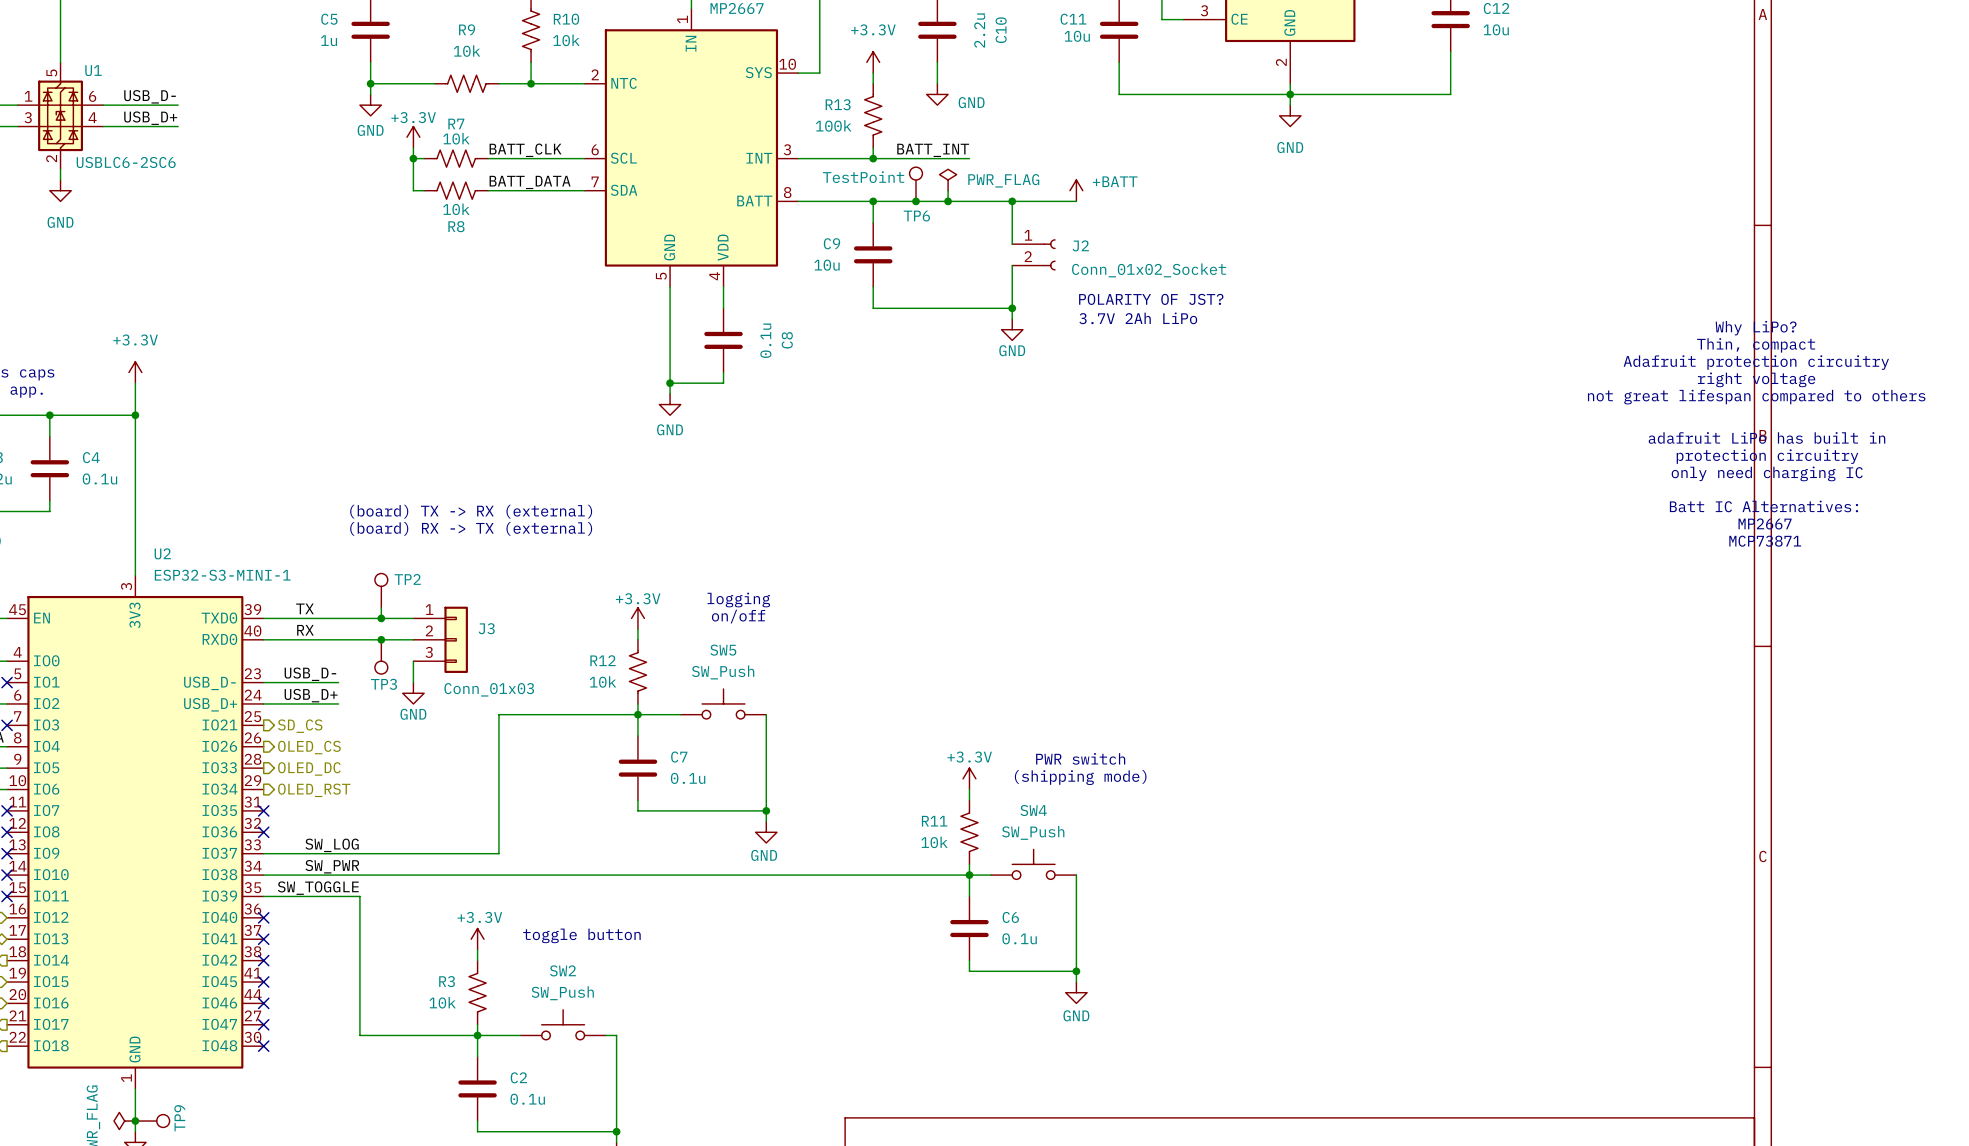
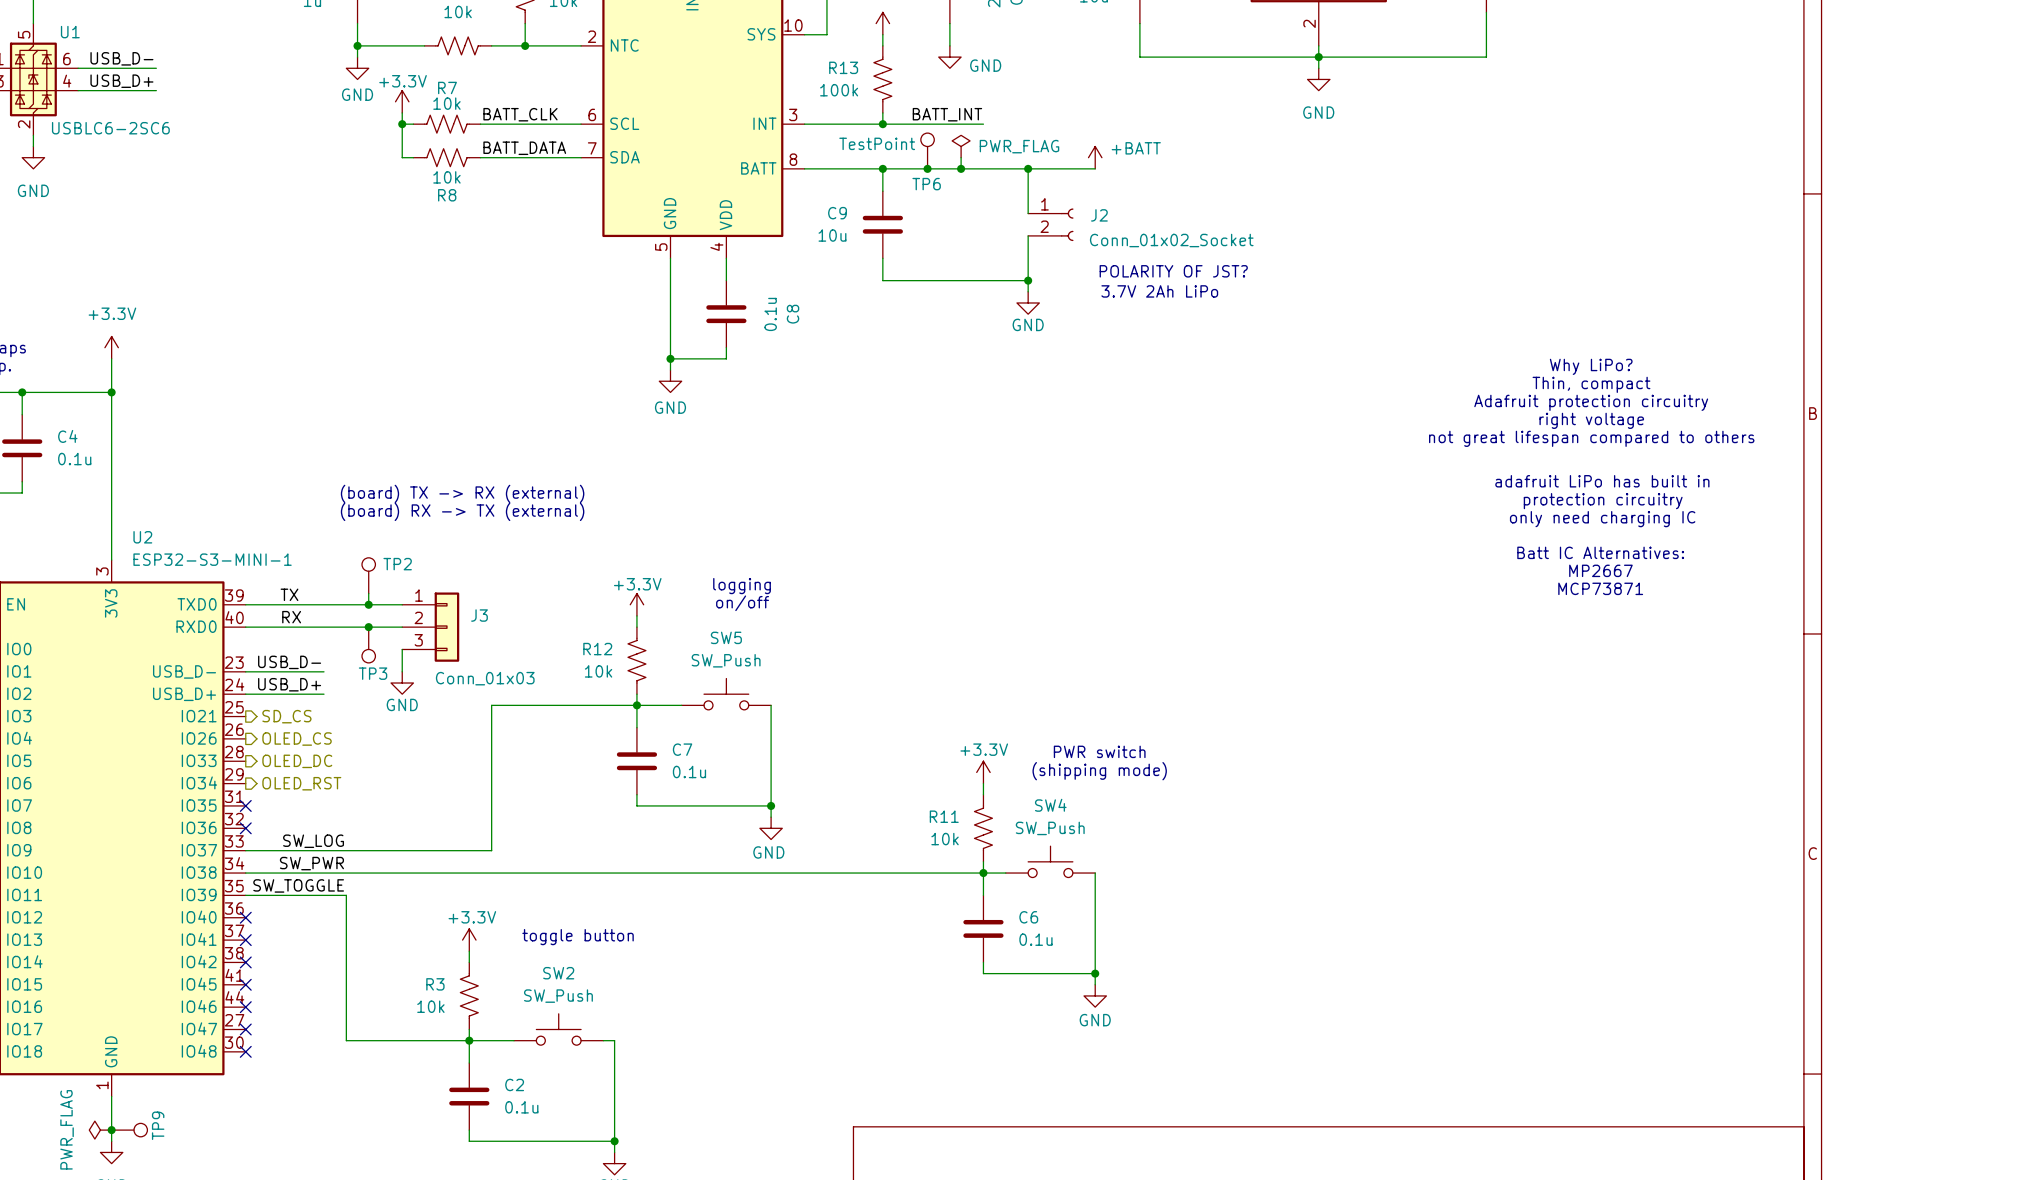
text: Why LiPo? (1756, 328) -> none
text: Thin, compact (1756, 345) -> none
text: Adafruit protection circuitry (1756, 362) -> none
text: right voltage (1756, 379) -> none
text: none -> Why LiPo? (1591, 366)
text: not great lifespan compared to others (1756, 397) -> none
text: none -> Thin, compact (1591, 384)
text: none -> Adafruit protection circuitry (1591, 402)
text: adafruit LiPo has built in (1766, 437) -> none
text: none -> right voltage (1591, 420)
text: protection circuitry (1767, 456) -> none
text: none -> not great lifespan compared to others (1591, 438)
text: only need charging IC (1767, 473) -> none
text: none -> adafruit LiPo has built in (1602, 481)
text: Batt IC Alternatives: (1763, 506) -> none
text: none -> protection circuitry (1603, 501)
text: MP2667 (1765, 523) -> none
text: none -> only need charging IC (1602, 519)
text: MCP73871 (1765, 541) -> none
text: none -> Batt IC Alternatives: (1600, 552)
text: none -> MP2667 (1600, 570)
text: none -> MCP73871 (1600, 588)

